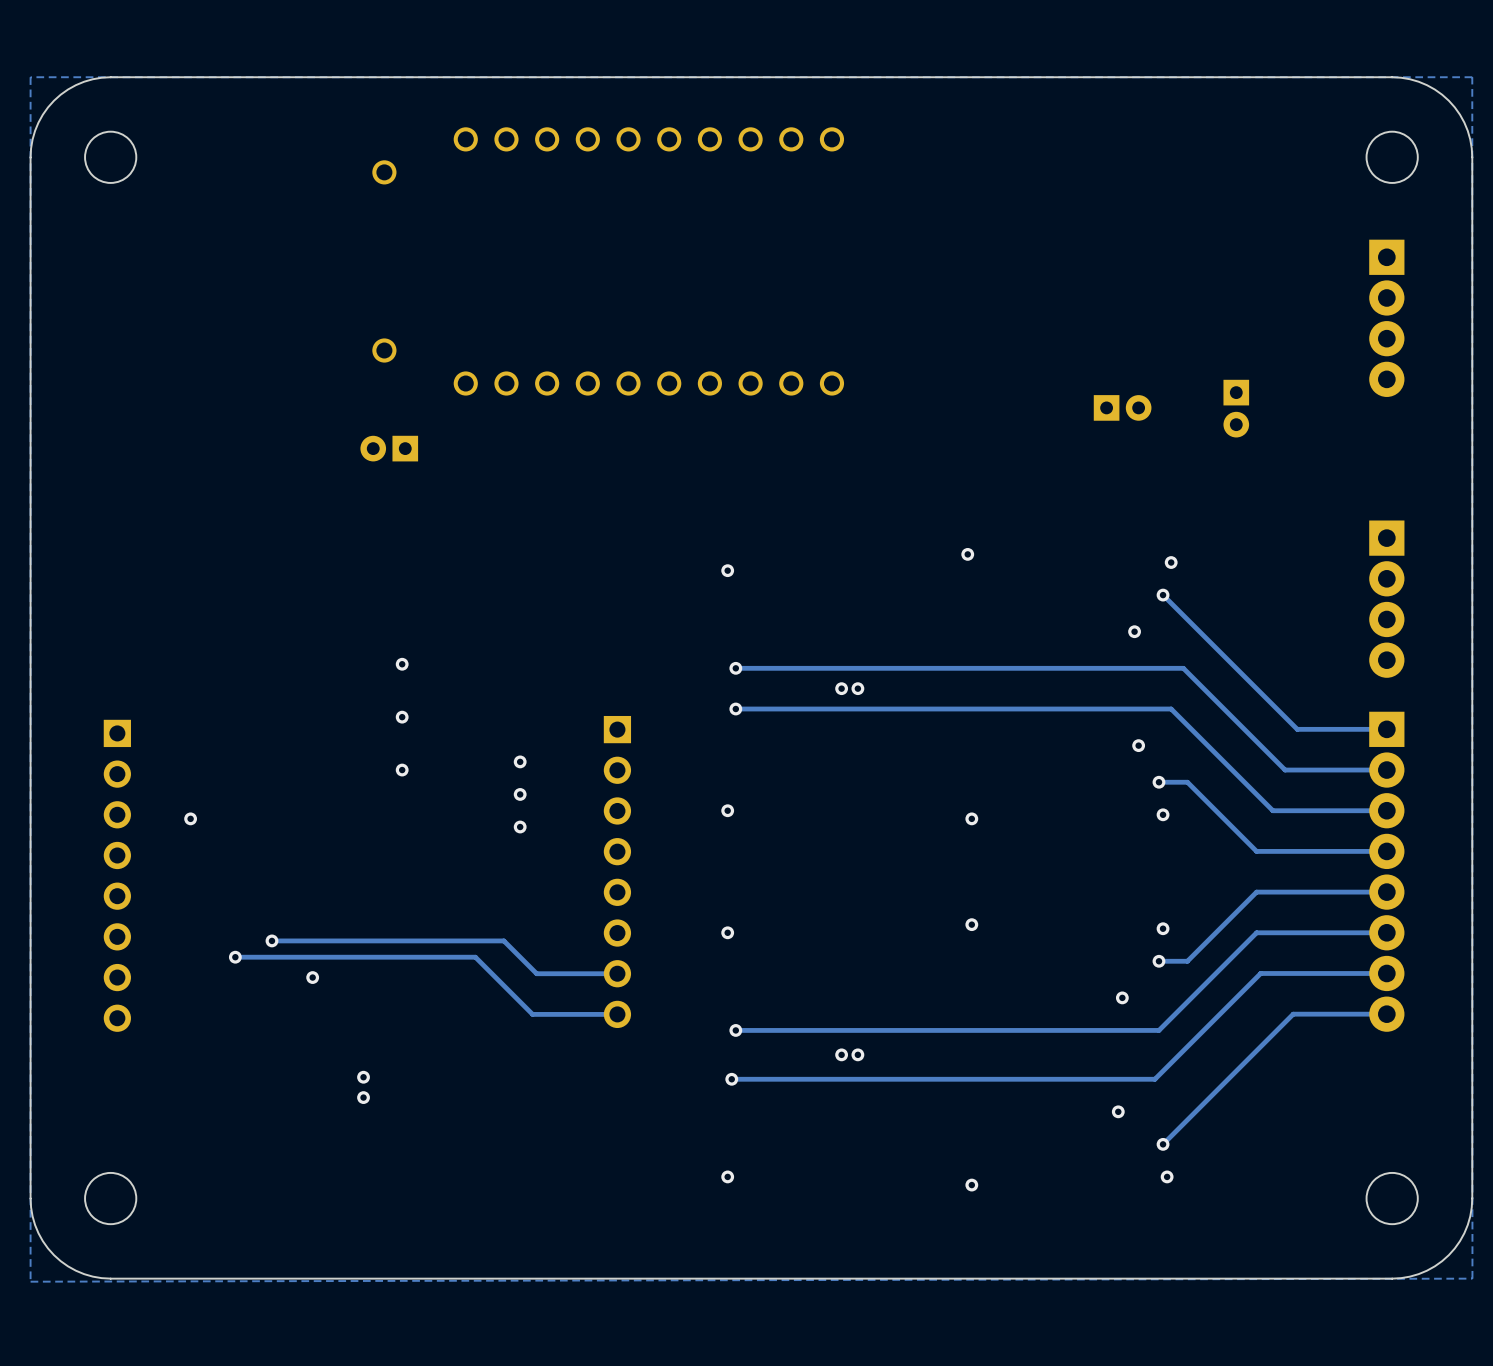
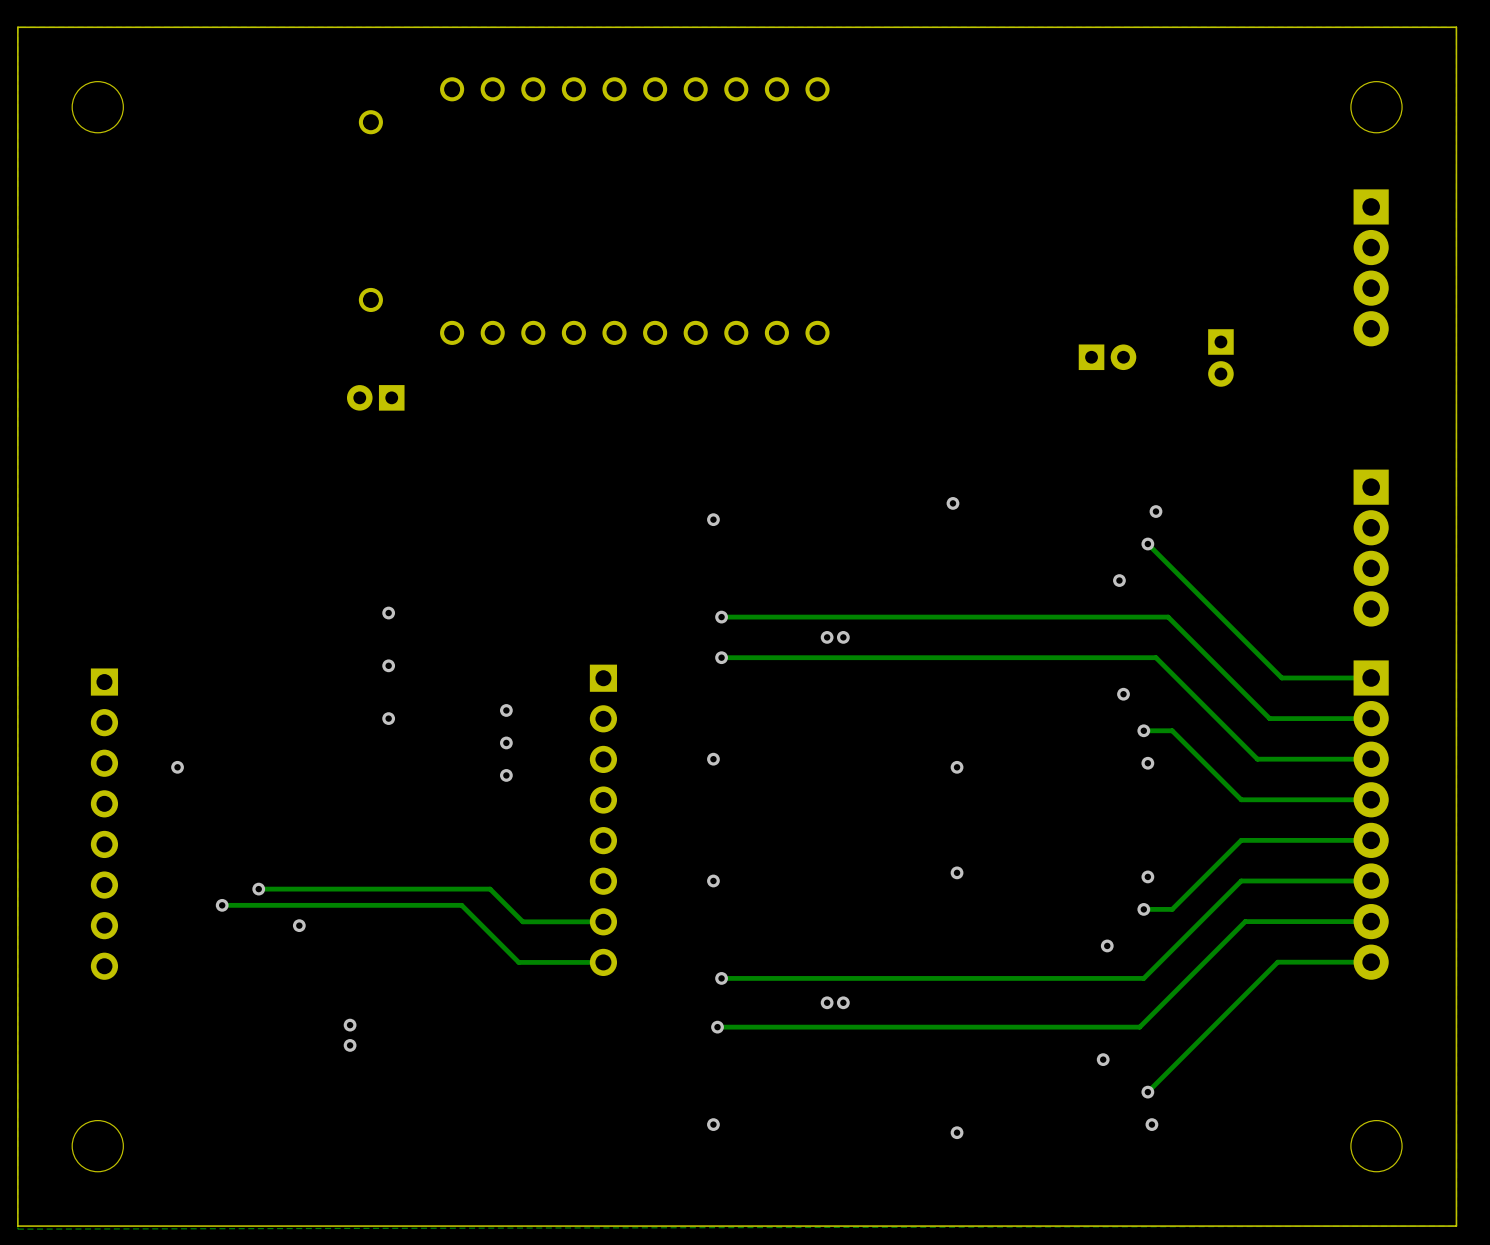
board edge: (110, 77) (92, 79) (75, 85) (54, 100) (42, 114) (35, 130) (30, 157) -> (97, 27) (17, 27) (17, 107)
board edge: (1392, 77) (1410, 79) (1426, 85) (1448, 100) (1464, 122) (1470, 139) (1472, 157) -> (1376, 27) (1456, 27) (1456, 107)
board edge: (30, 1198) (35, 1225) (42, 1241) (54, 1255) (68, 1266) (84, 1274) (110, 1278) -> (17, 1146) (17, 1226) (97, 1226)
board edge: (1472, 1198) (1467, 1225) (1460, 1241) (1448, 1255) (1434, 1266) (1418, 1274) (1392, 1278) -> (1456, 1146) (1456, 1226) (1376, 1226)

